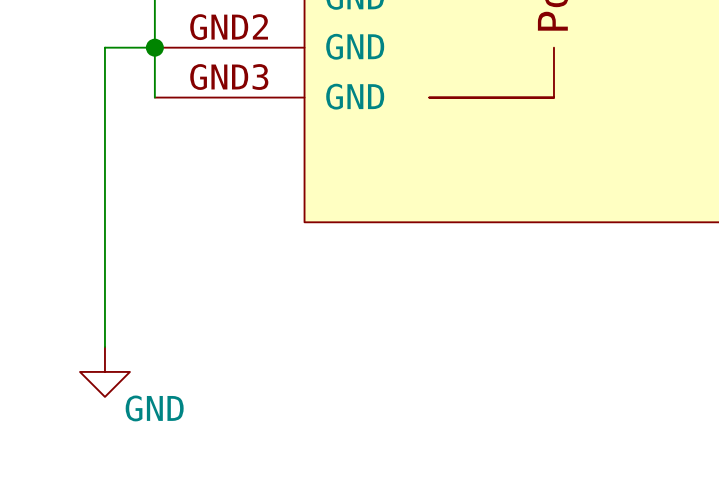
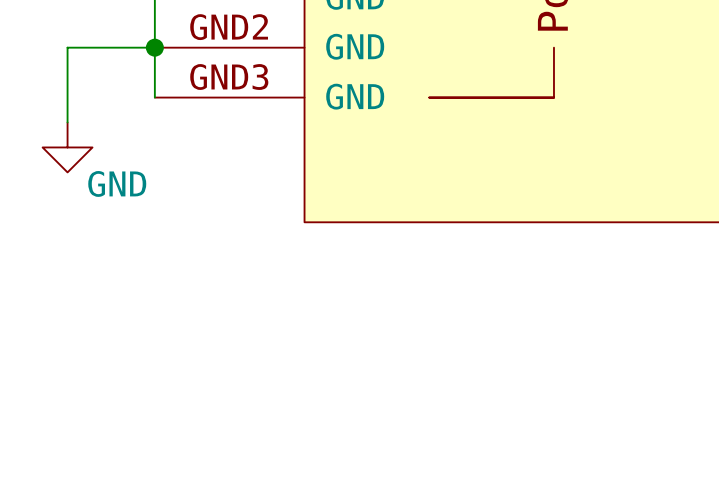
wire: (104, 47) (104, 347) -> (104, 47) (67, 47) (67, 122)
power symbol position: GND (104, 371) -> GND (67, 147)

